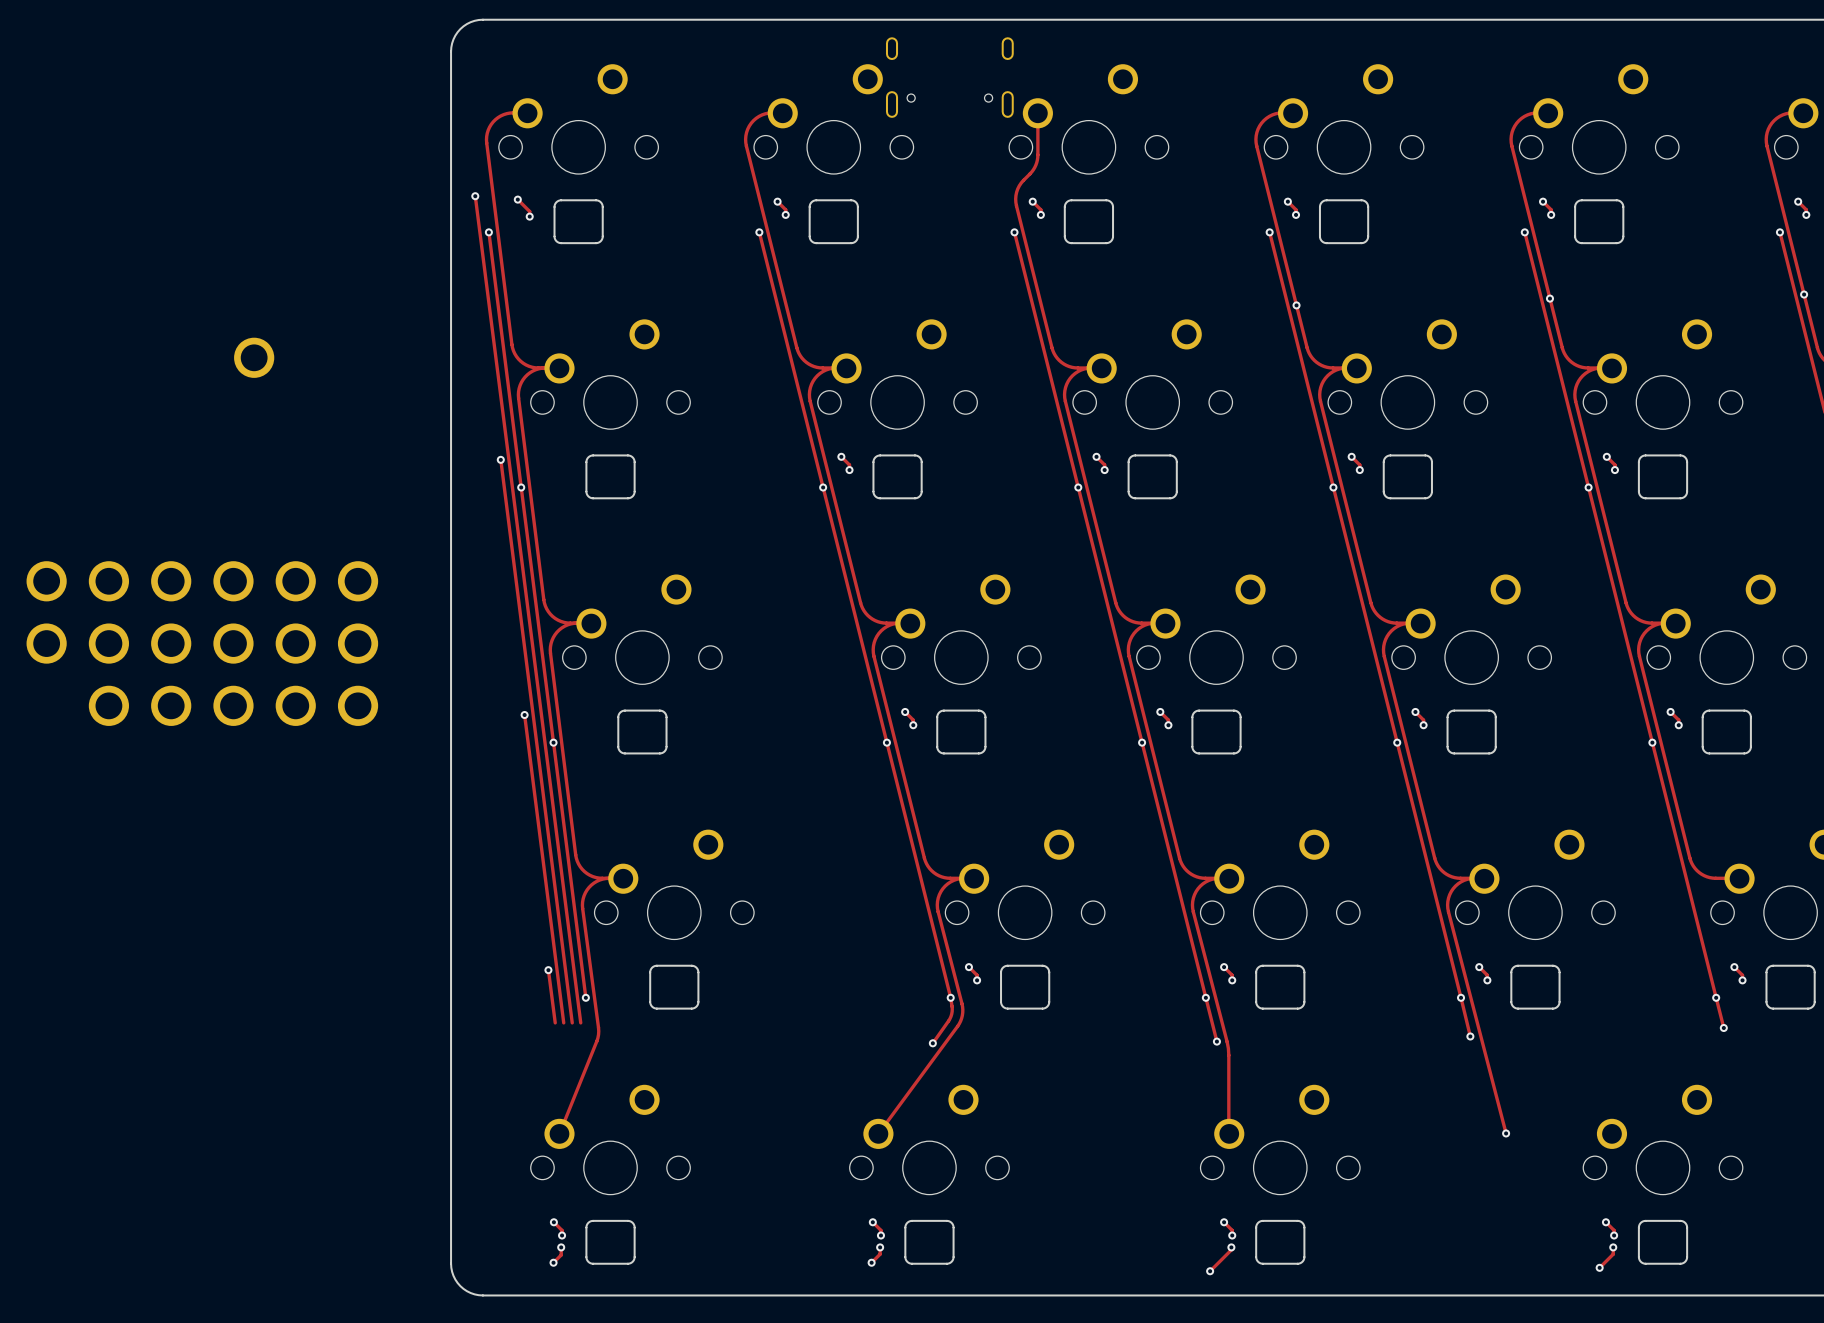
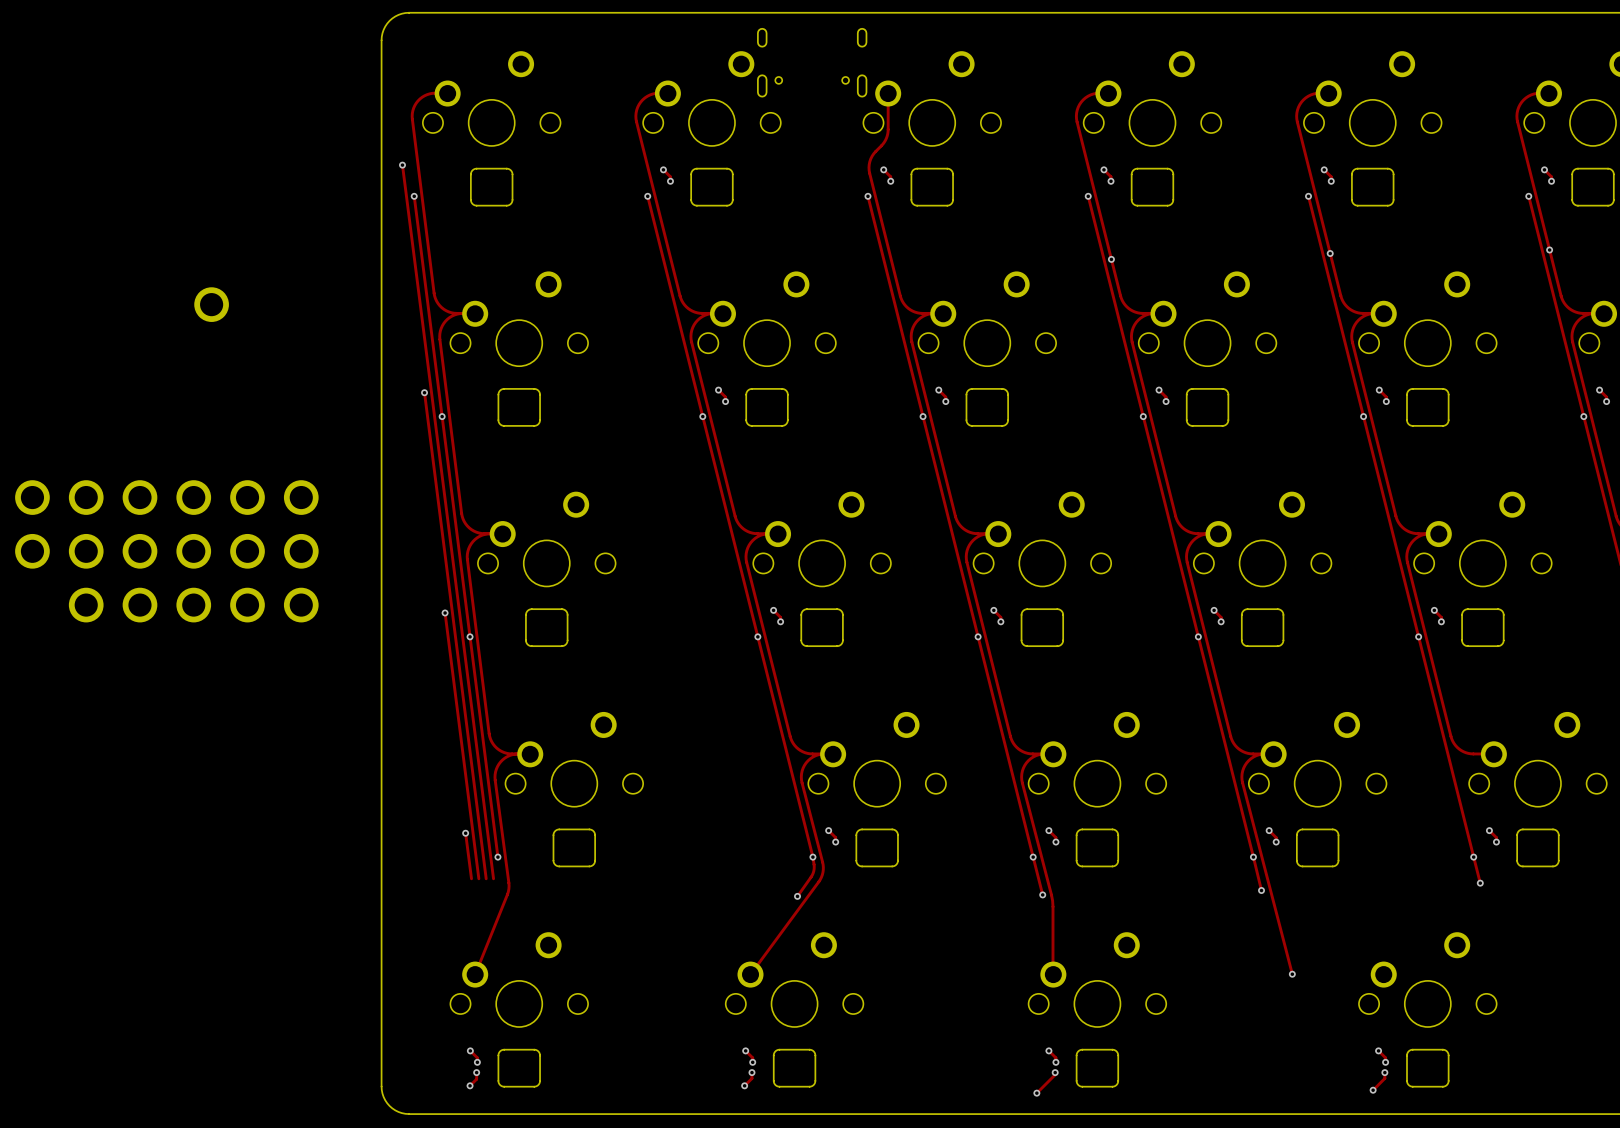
track: (517, 199) (529, 211) (529, 216) -> none
via: (517, 199) -> none
via: (529, 216) -> none

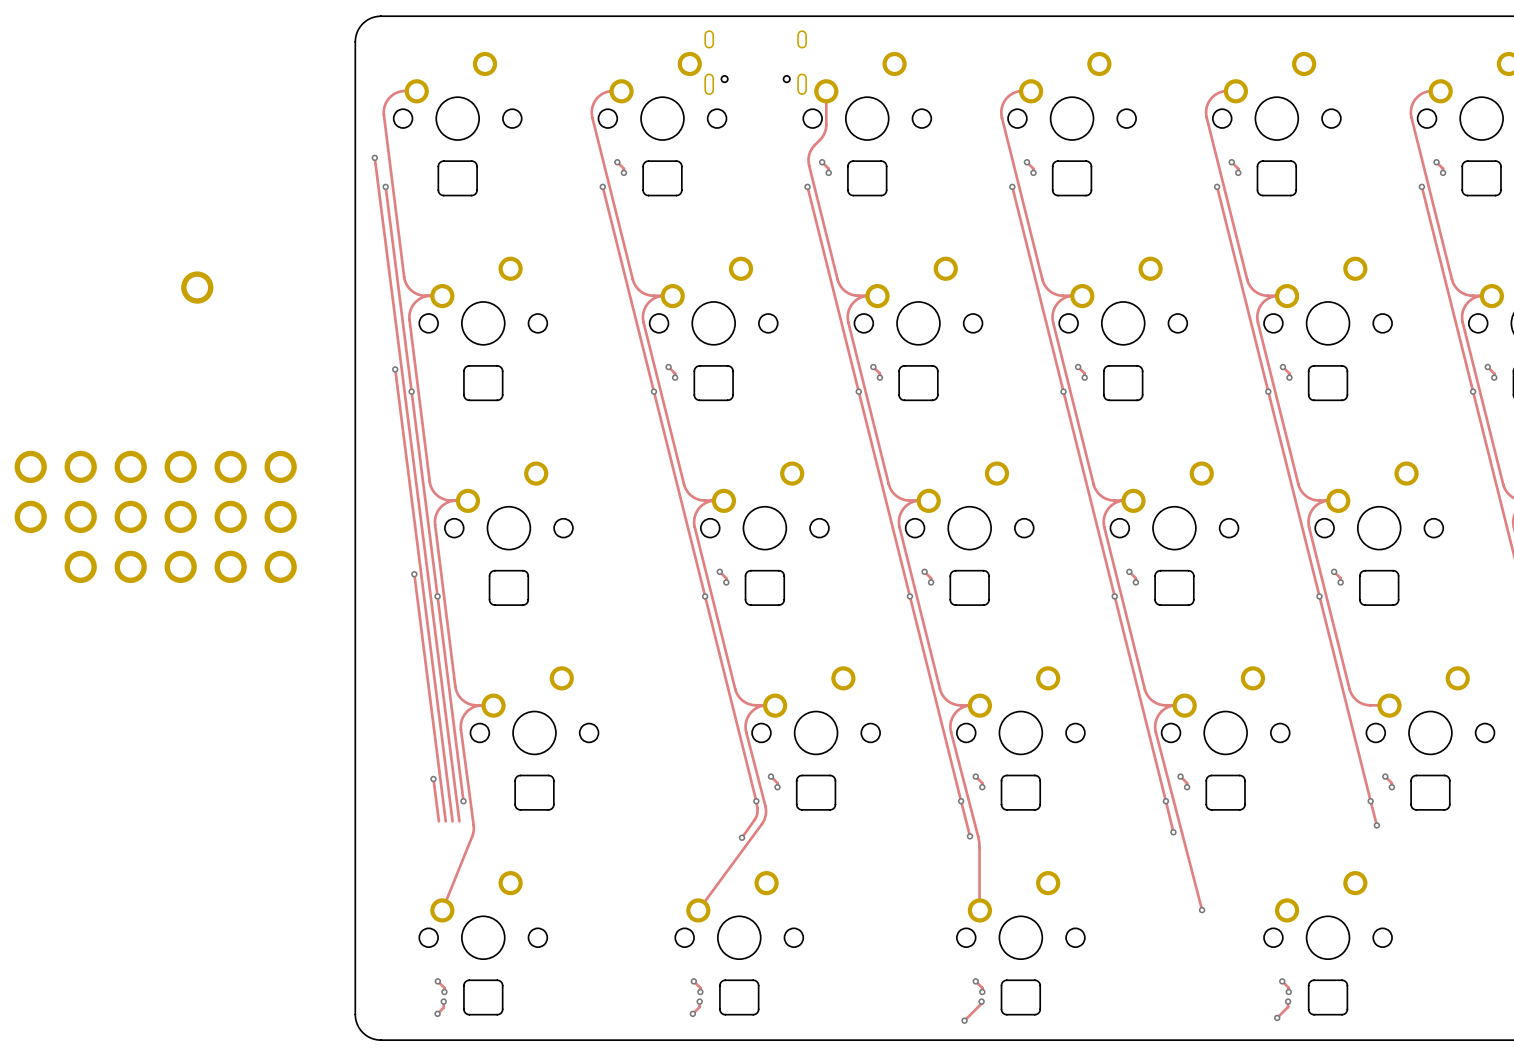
via: (1549, 249) -> none
via: (1330, 253) -> none
via: (1111, 259) -> none

